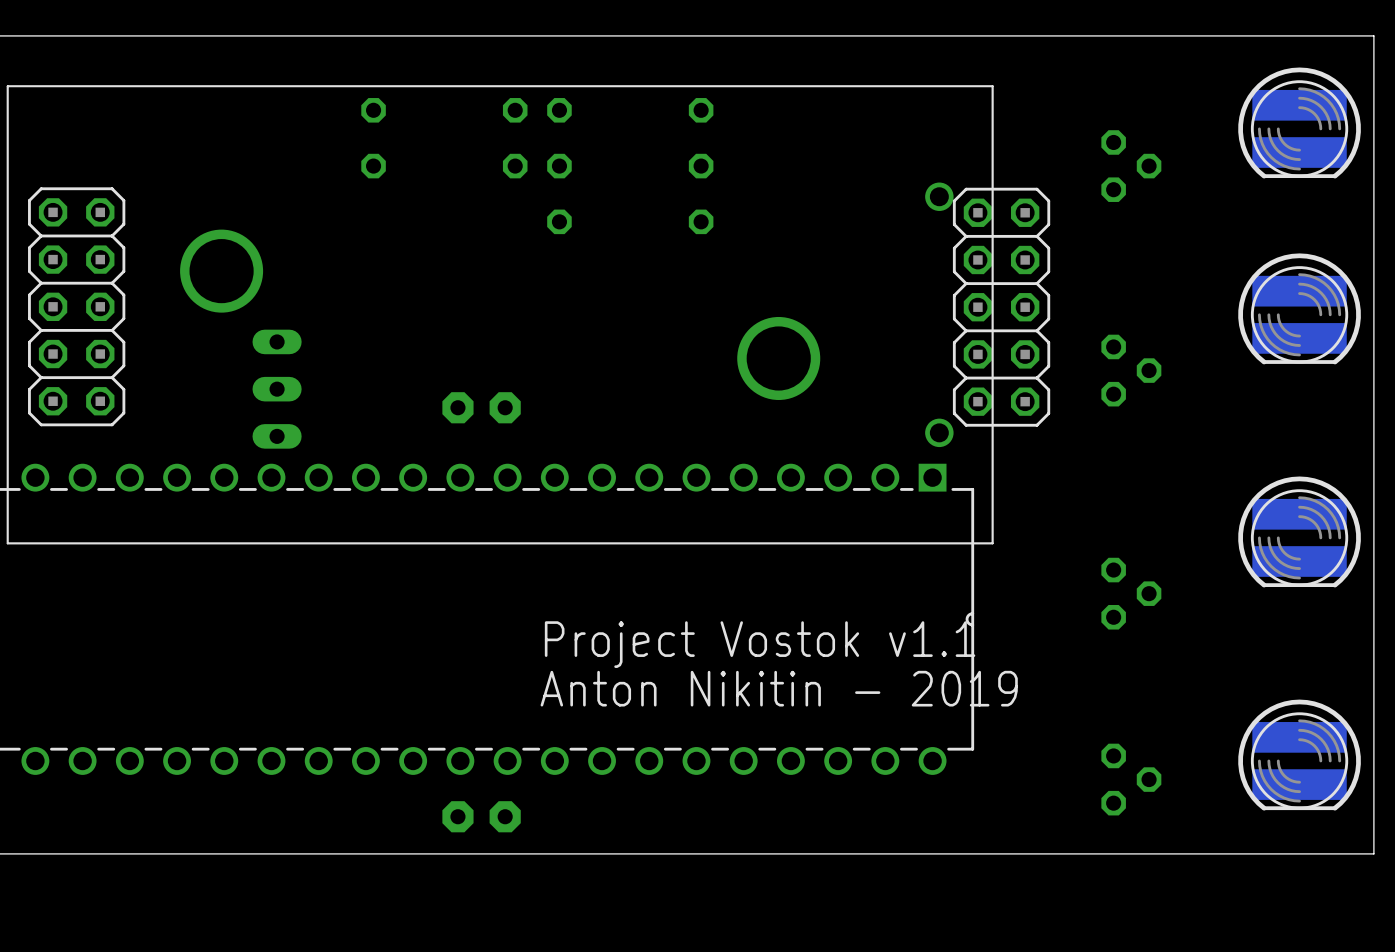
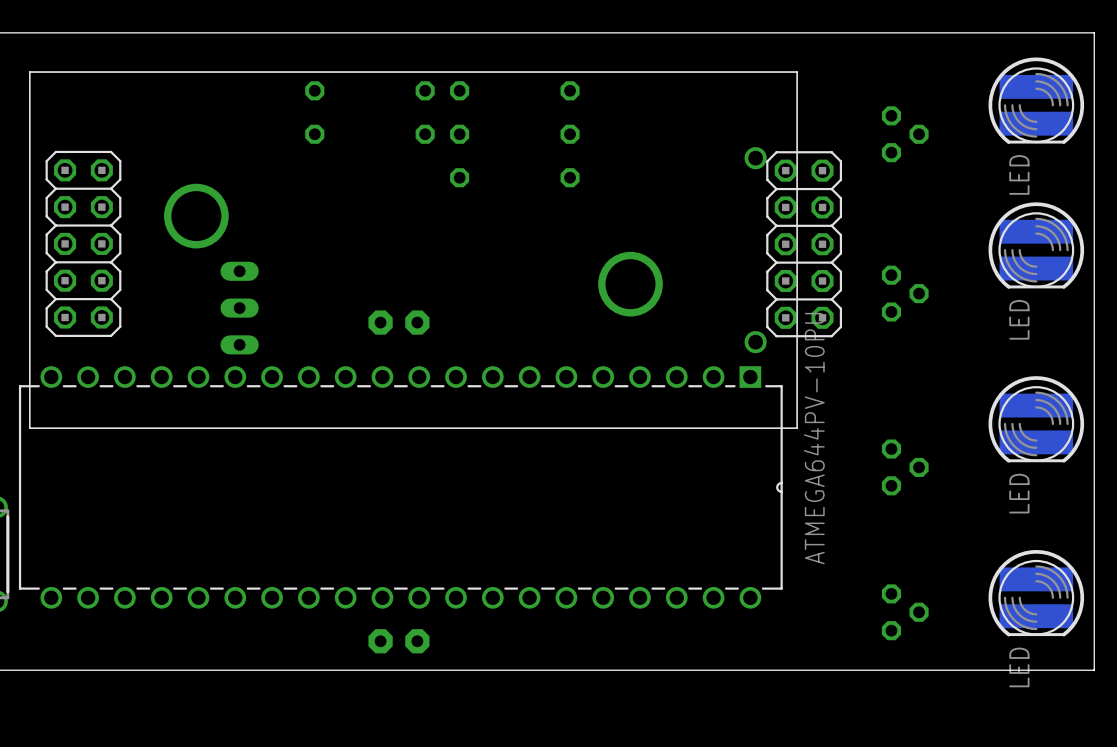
part value: none -> LED (1019, 174)
part value: none -> LED (1019, 319)
part value: none -> ATMEGA644PV-10PU (814, 438)
part value: none -> LED (1019, 493)
text: Project Vostok v1.1 (760, 644) -> none
text: Anton Nikitin - 2019 (779, 688) -> none
part value: none -> LED (1019, 667)

